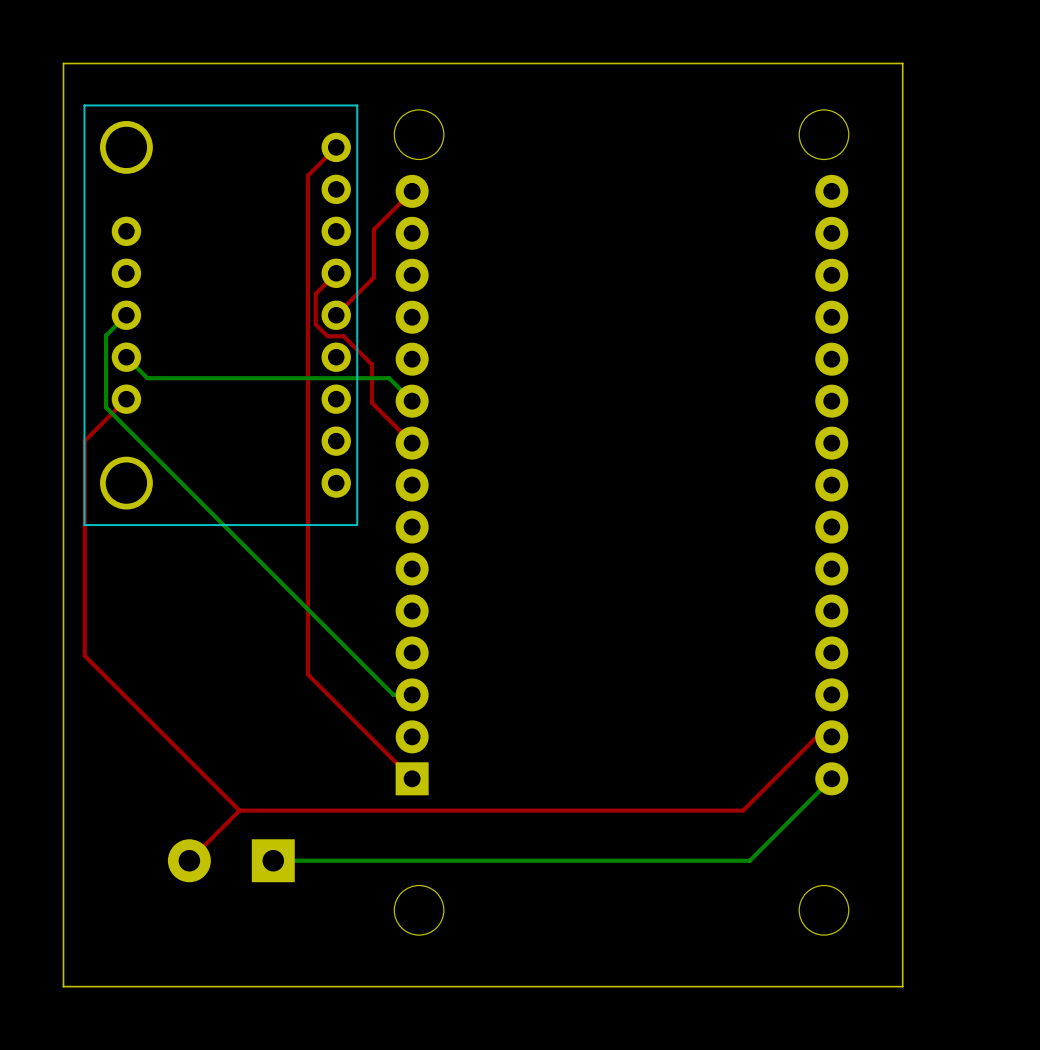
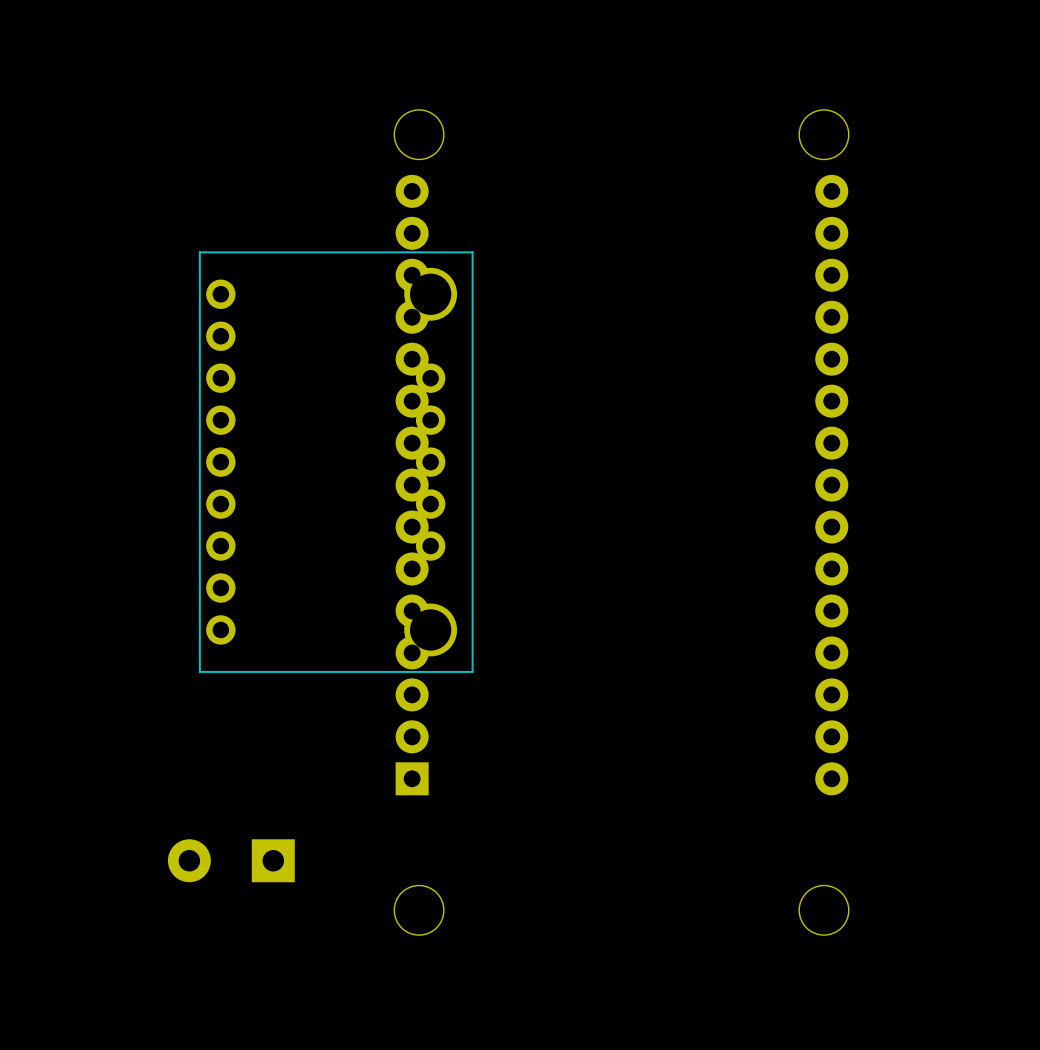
board edge: (902, 63) (63, 63) (63, 986) (902, 986) (902, 63) -> none
top track: (336, 147) (307, 175) (307, 674) (412, 778) -> none
top track: (412, 191) (373, 229) (373, 277) (336, 315) -> none
top track: (336, 273) (315, 293) (315, 324) (327, 336) (343, 336) (371, 364) (371, 402) (412, 443) -> none
bottom track: (126, 315) (106, 335) (106, 407) (393, 694) (412, 694) -> none
part rotation: 0° (220, 315) -> 180° (336, 462)
bottom track: (126, 357) (147, 378) (389, 378) (412, 401) -> none
top track: (126, 399) (84, 440) (84, 655) (239, 810) -> none
top track: (831, 736) (816, 736) (743, 810) (239, 810) -> none
bottom track: (831, 778) (749, 860) (273, 860) -> none
top track: (239, 810) (189, 860) -> none

